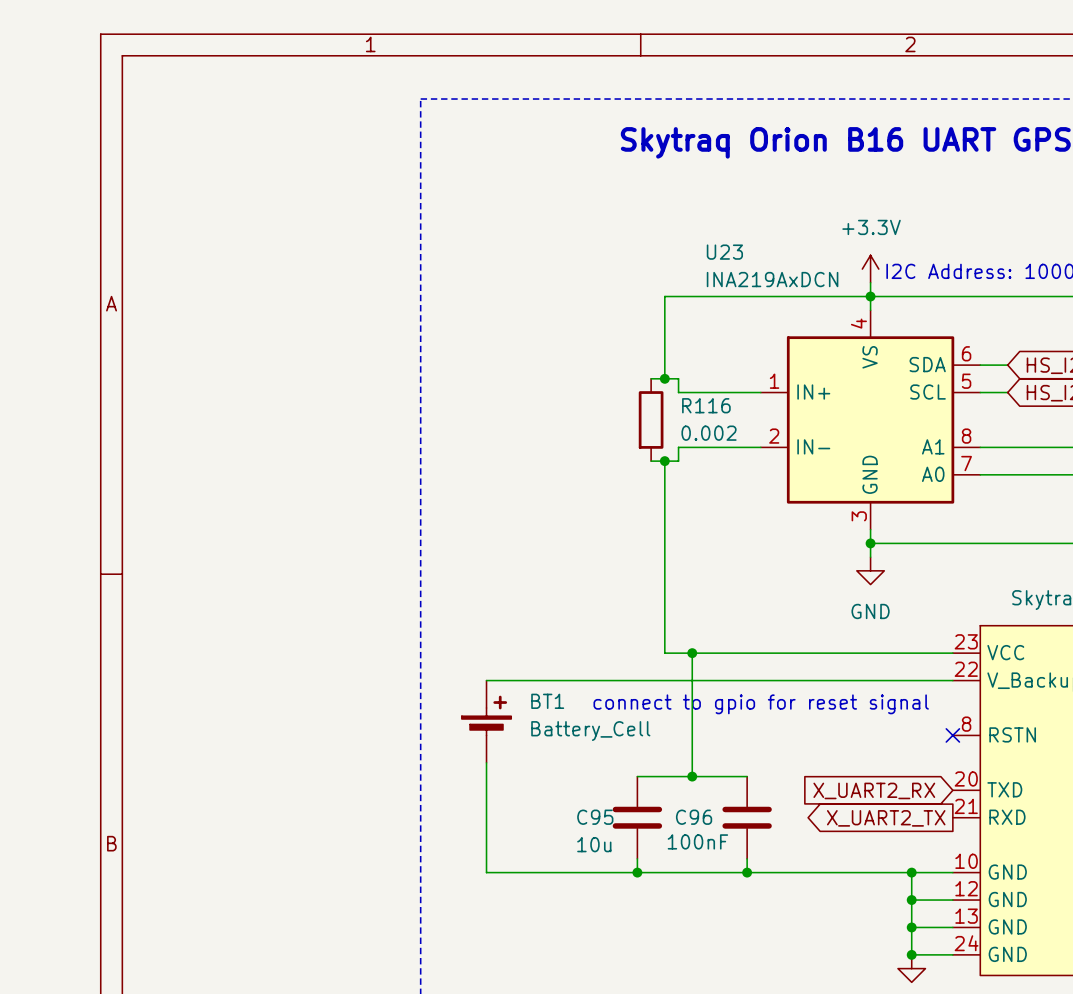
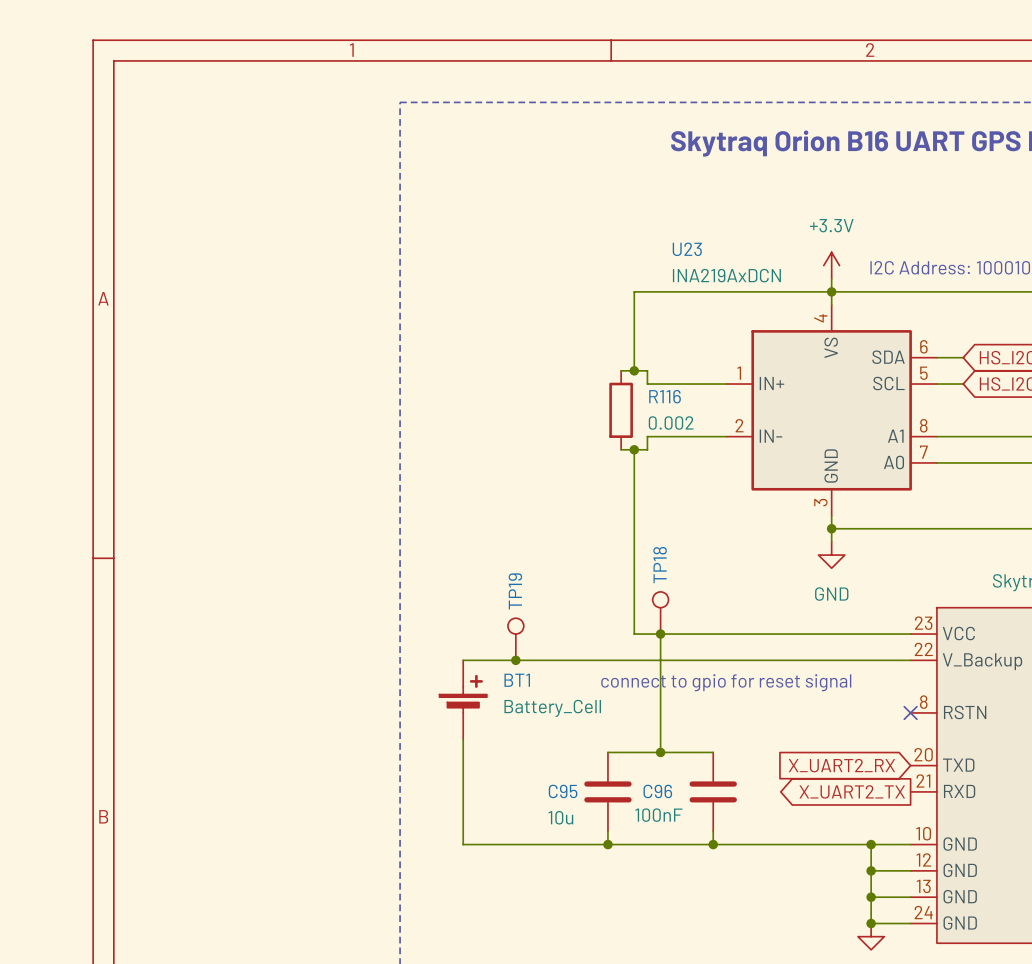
TP18: none -> (660, 612)
TP19: none -> (515, 639)
junction: none -> (515, 660)

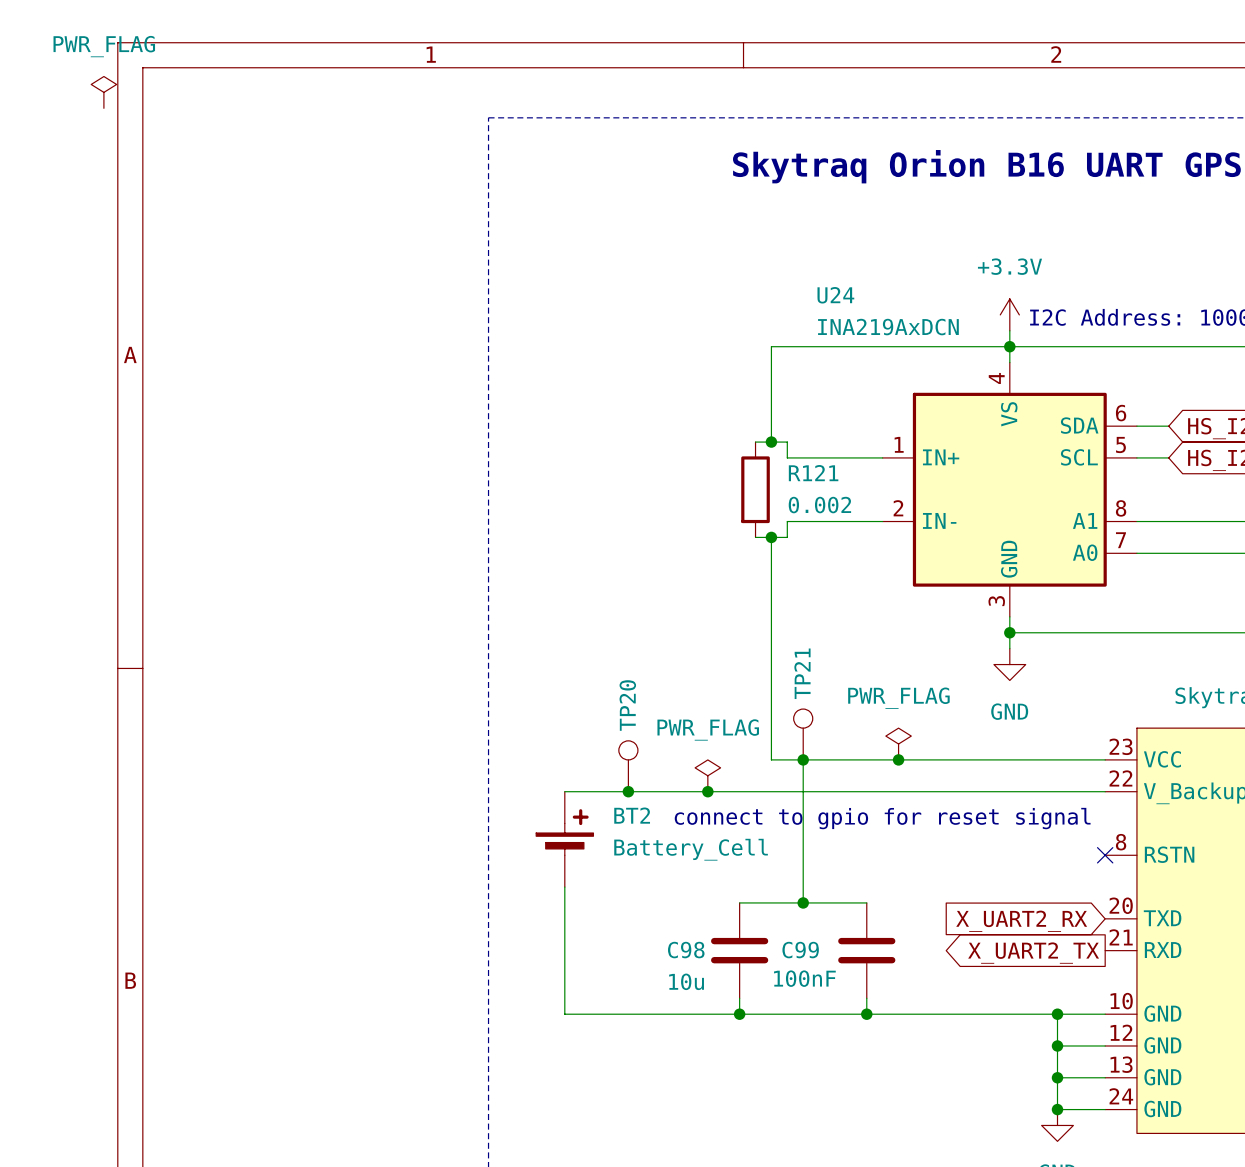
power symbol: none -> PWR_FLAG (103, 92)
U23 name: U23 (687, 249) -> U24 (835, 295)
R116 name: R116 (665, 396) -> R121 (813, 473)
TP18 name: TP18 (660, 565) -> TP21 (802, 673)
TP19 name: TP19 (515, 591) -> TP20 (627, 705)
power symbol: none -> PWR_FLAG (898, 744)
junction: none -> (898, 759)
power symbol: none -> PWR_FLAG (707, 775)
junction: none -> (707, 791)
BT1 name: BT1 (517, 680) -> BT2 (632, 815)
C95 name: C95 (563, 791) -> C98 (686, 950)
C96 name: C96 (657, 791) -> C99 (800, 950)

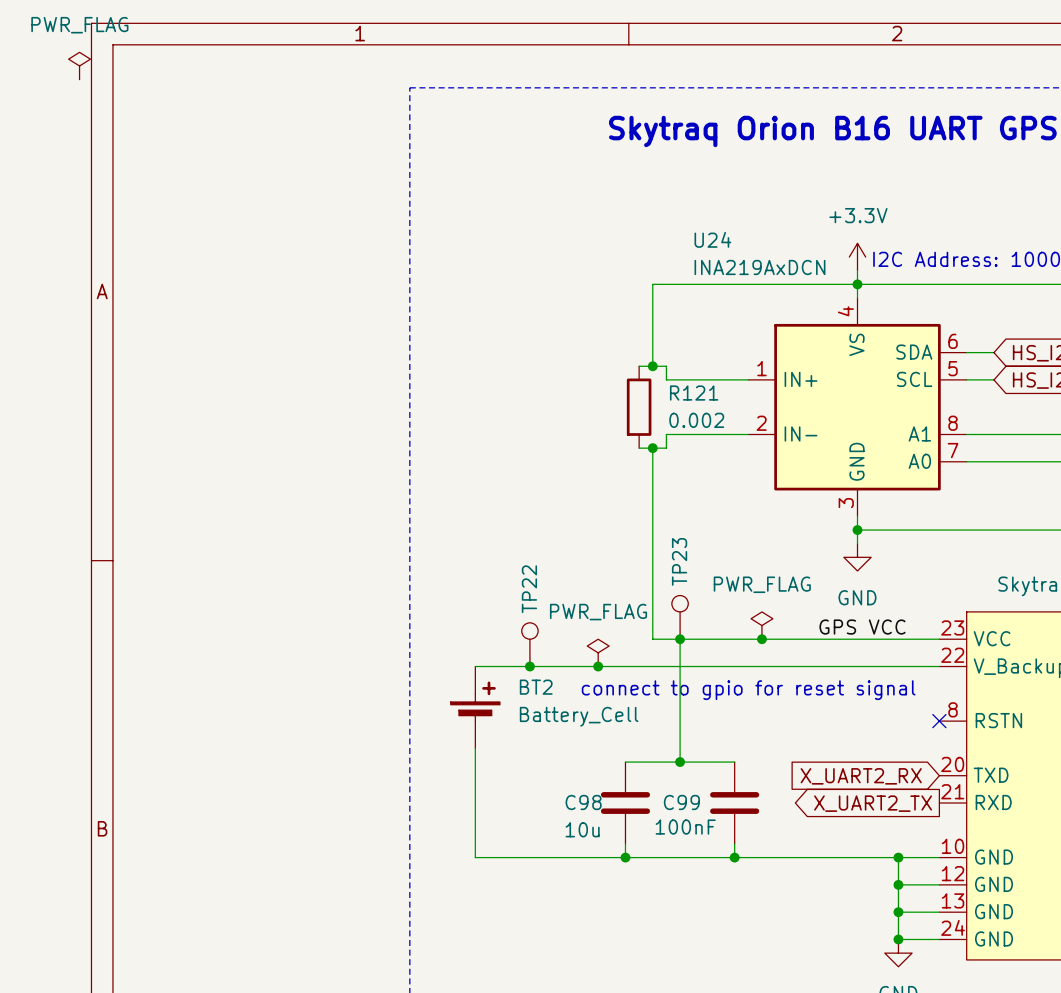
TP21 name: TP21 (802, 673) -> TP23 (679, 561)
TP20 name: TP20 (627, 705) -> TP22 (529, 589)
label: none -> GPS VCC (862, 627)

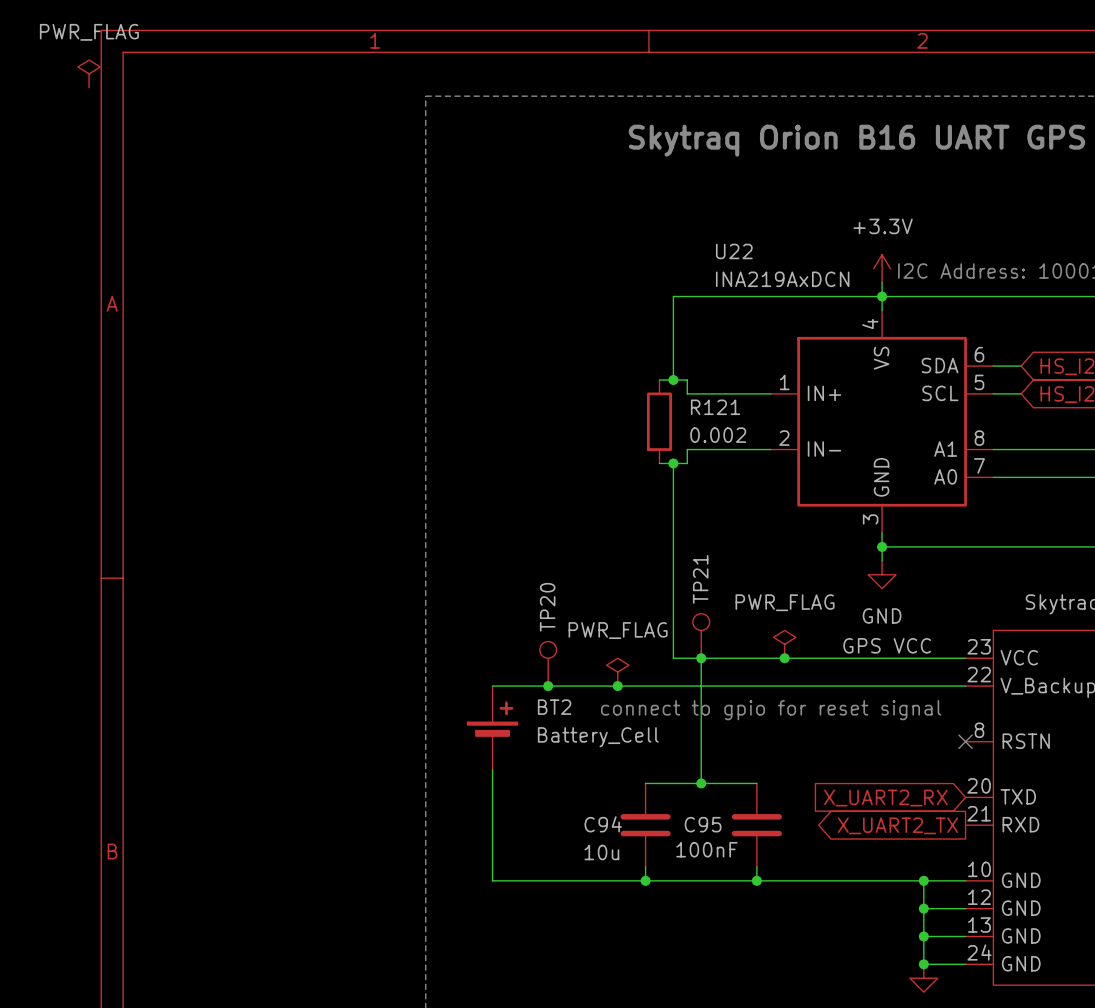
U24 name: U24 (712, 239) -> U22 (734, 251)
TP23 name: TP23 (679, 561) -> TP21 (700, 579)
TP22 name: TP22 (529, 589) -> TP20 (547, 607)
C98 name: C98 (583, 802) -> C94 (603, 824)
C99 name: C99 (681, 802) -> C95 (703, 824)

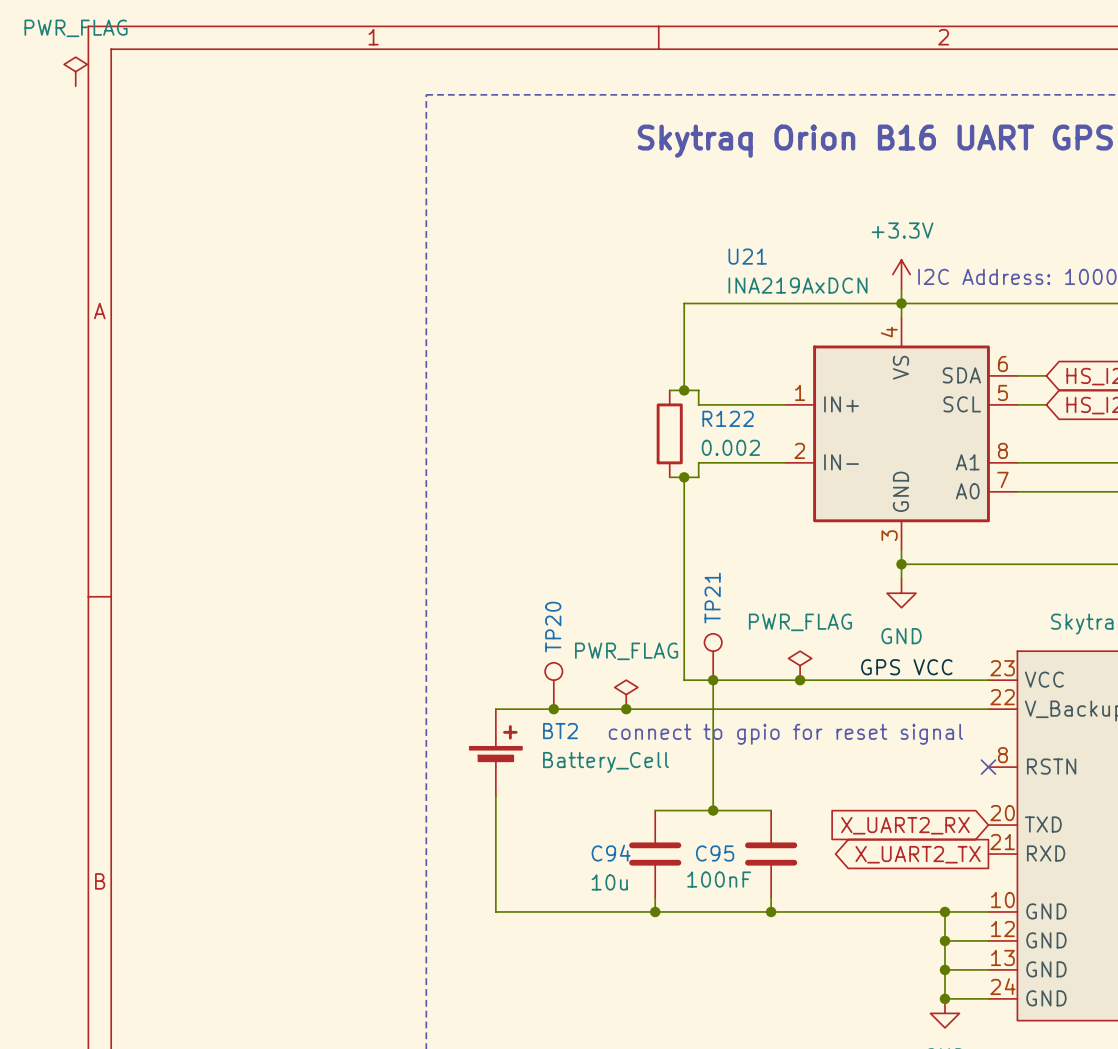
U22 name: U22 (734, 251) -> U21 (747, 256)
R121 name: R121 (715, 407) -> R122 (728, 418)

